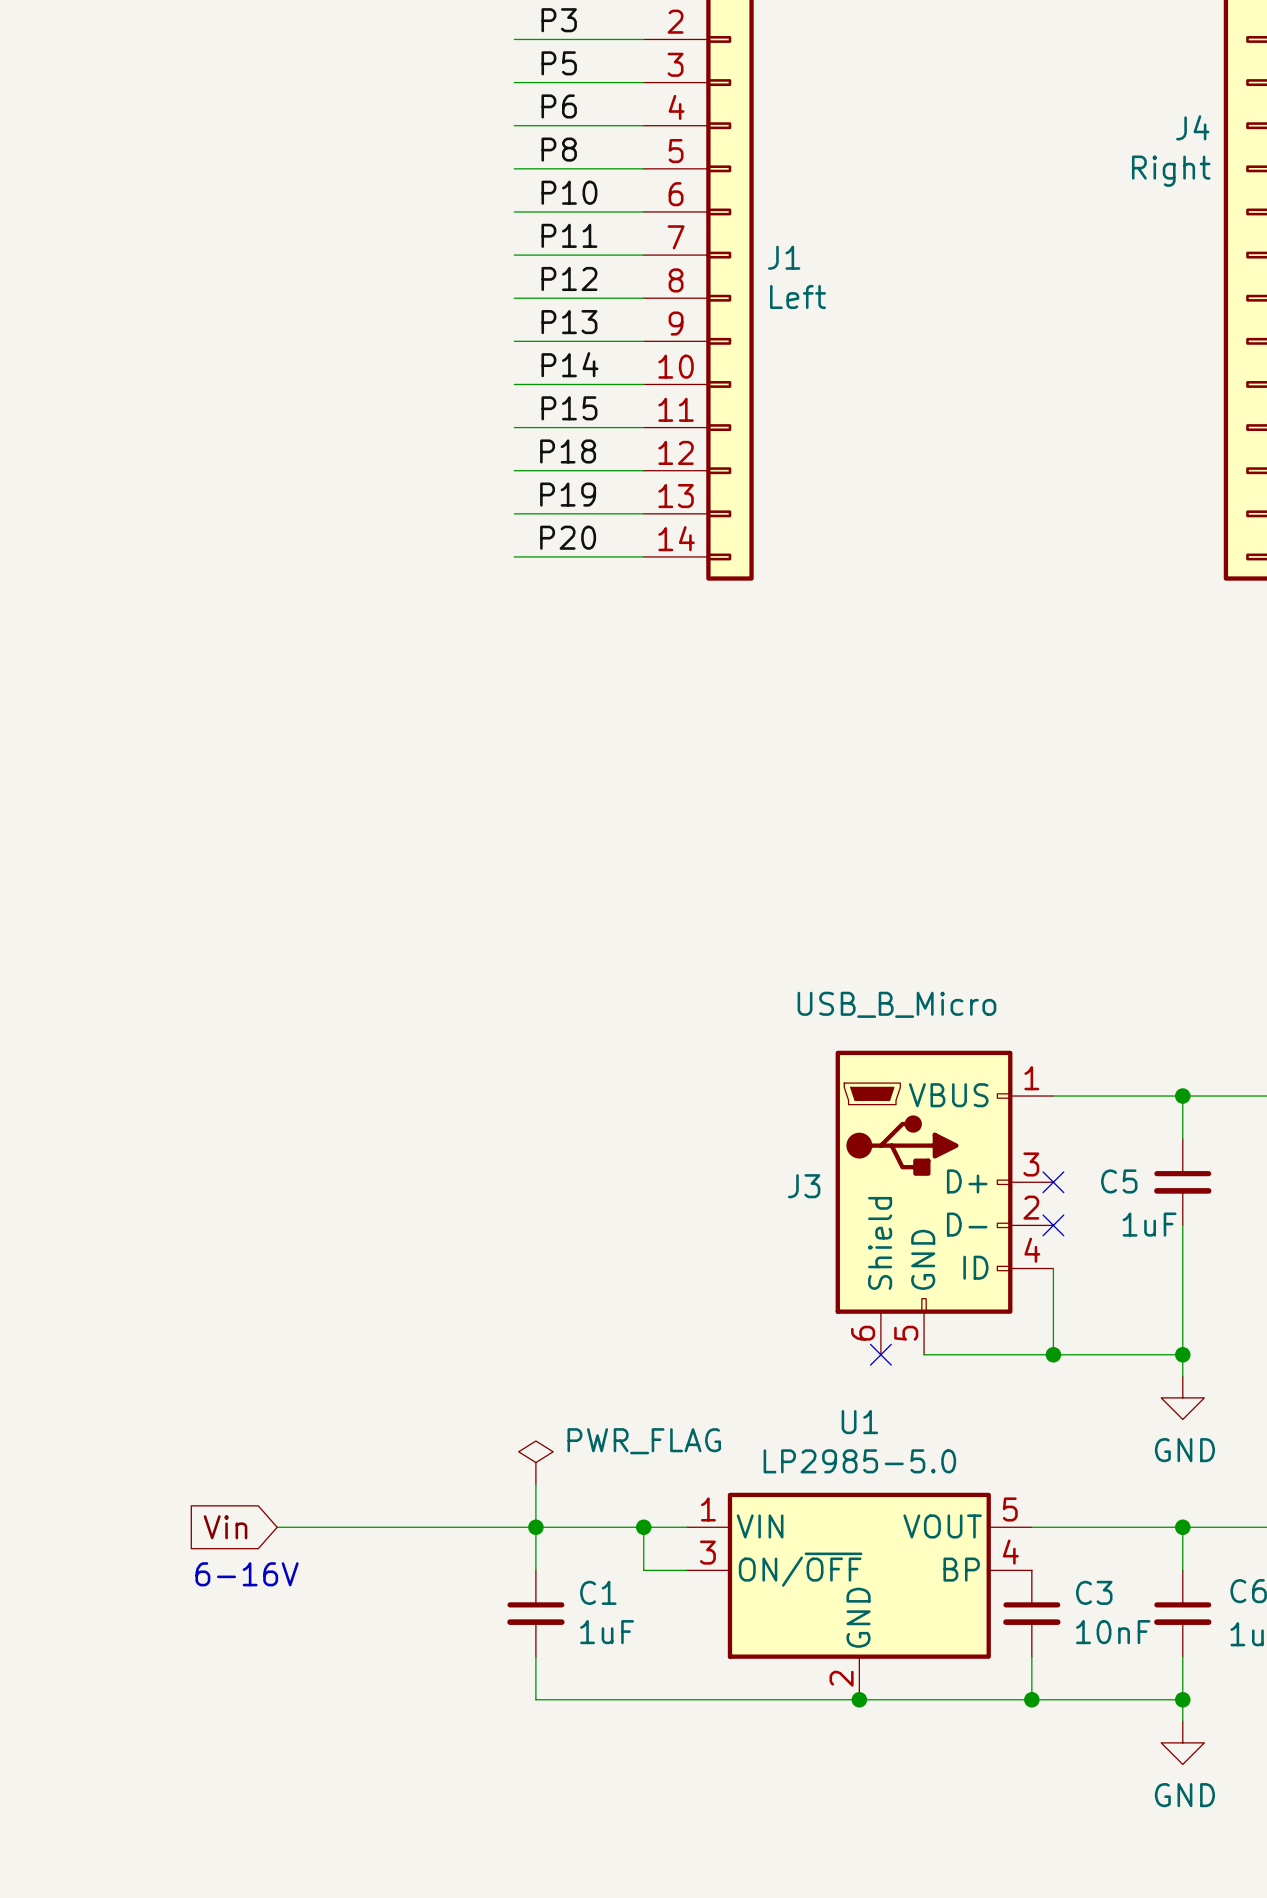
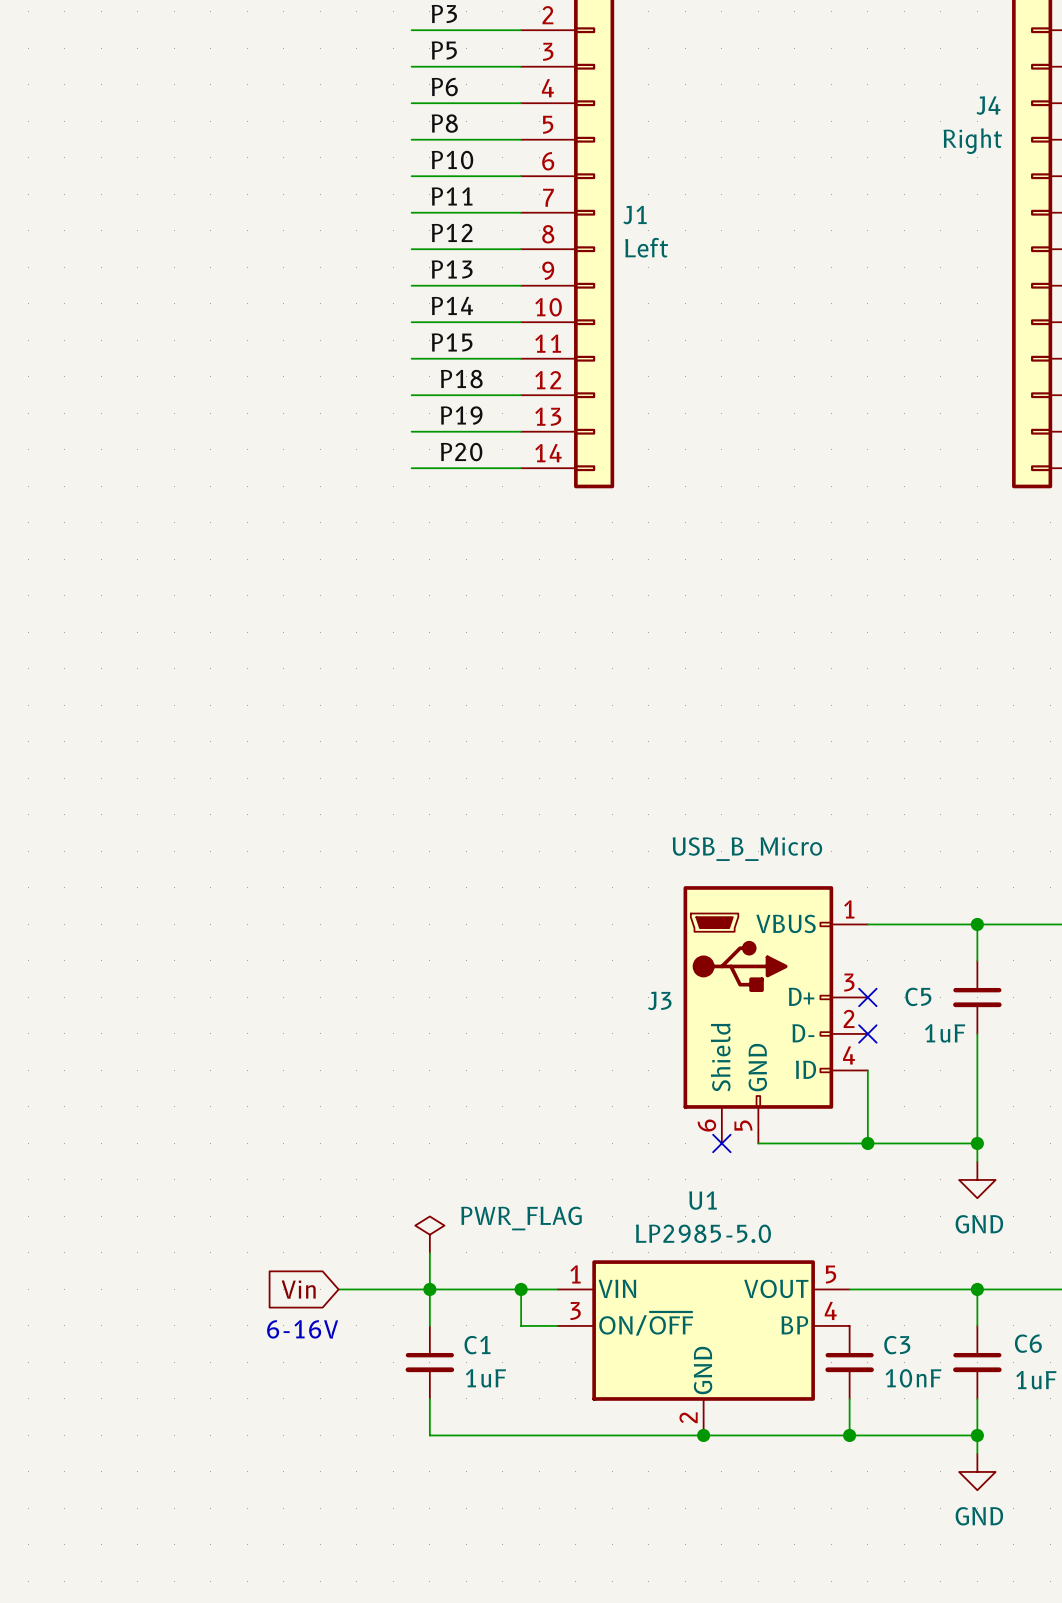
global label position: Vin (225, 1527) -> Vin (298, 1289)
wire: (277, 1527) (428, 1527) -> none
text position: 6-16V (247, 1574) -> 6-16V (302, 1329)

